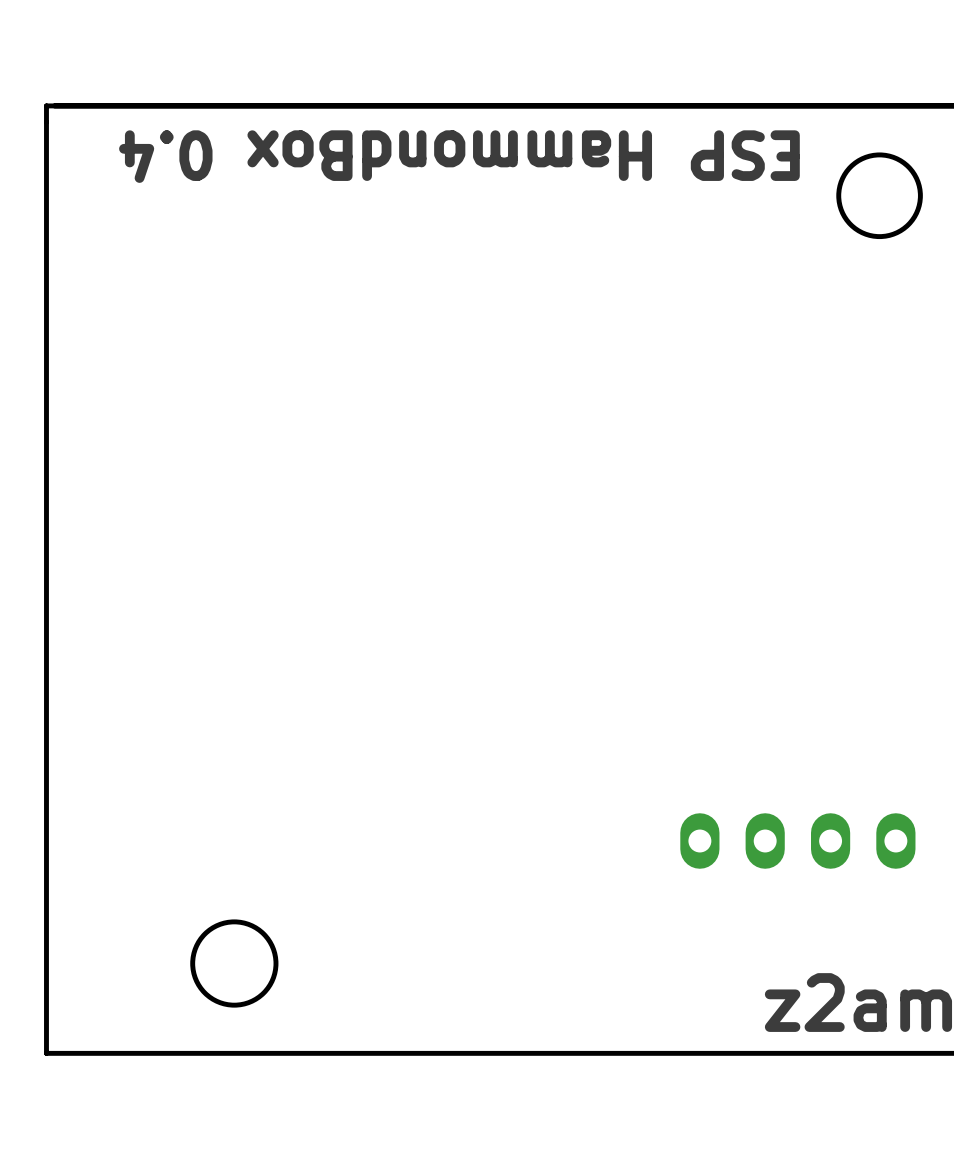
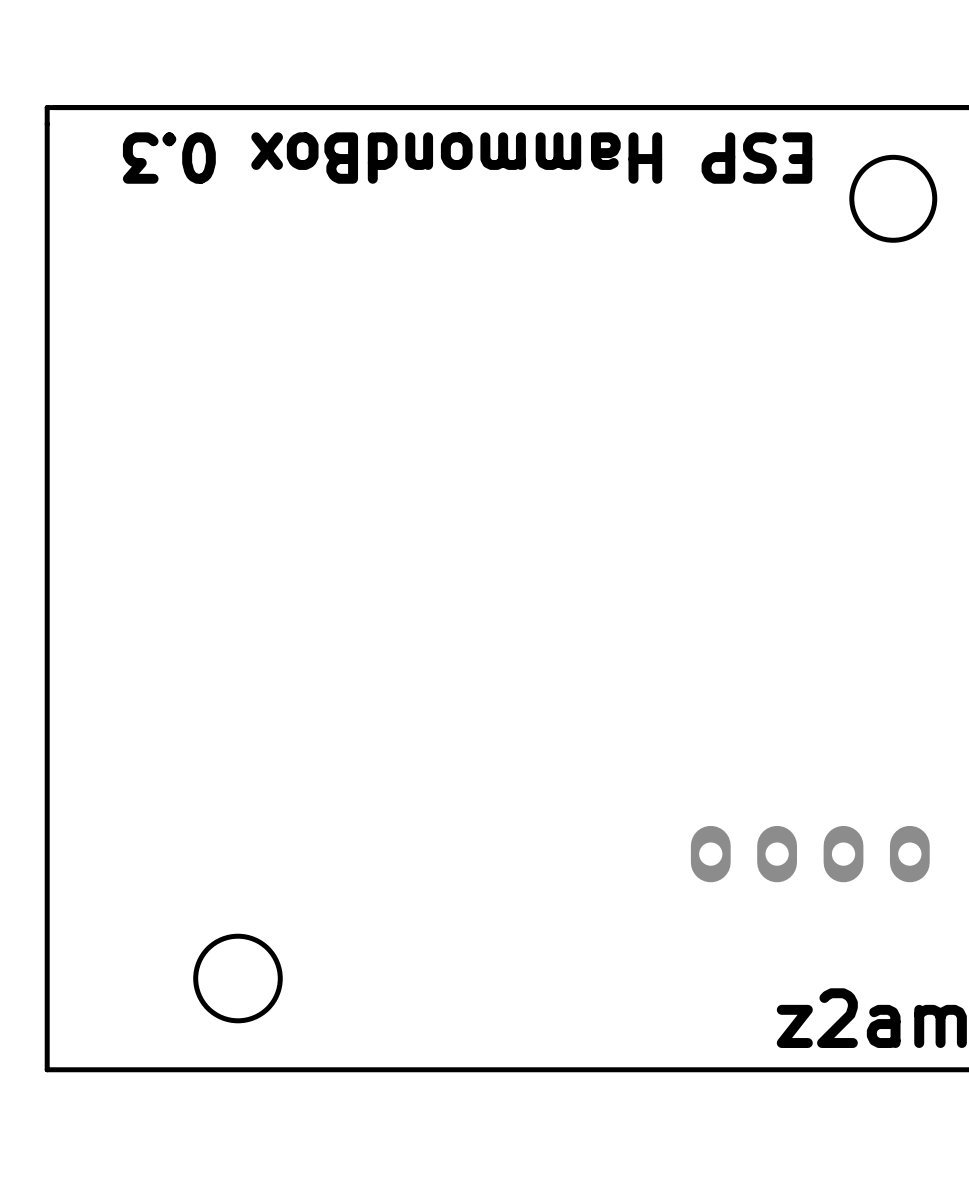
text: ESP HammondBox 0.4 (459, 156) -> ESP HammondBox 0.3 (467, 158)

